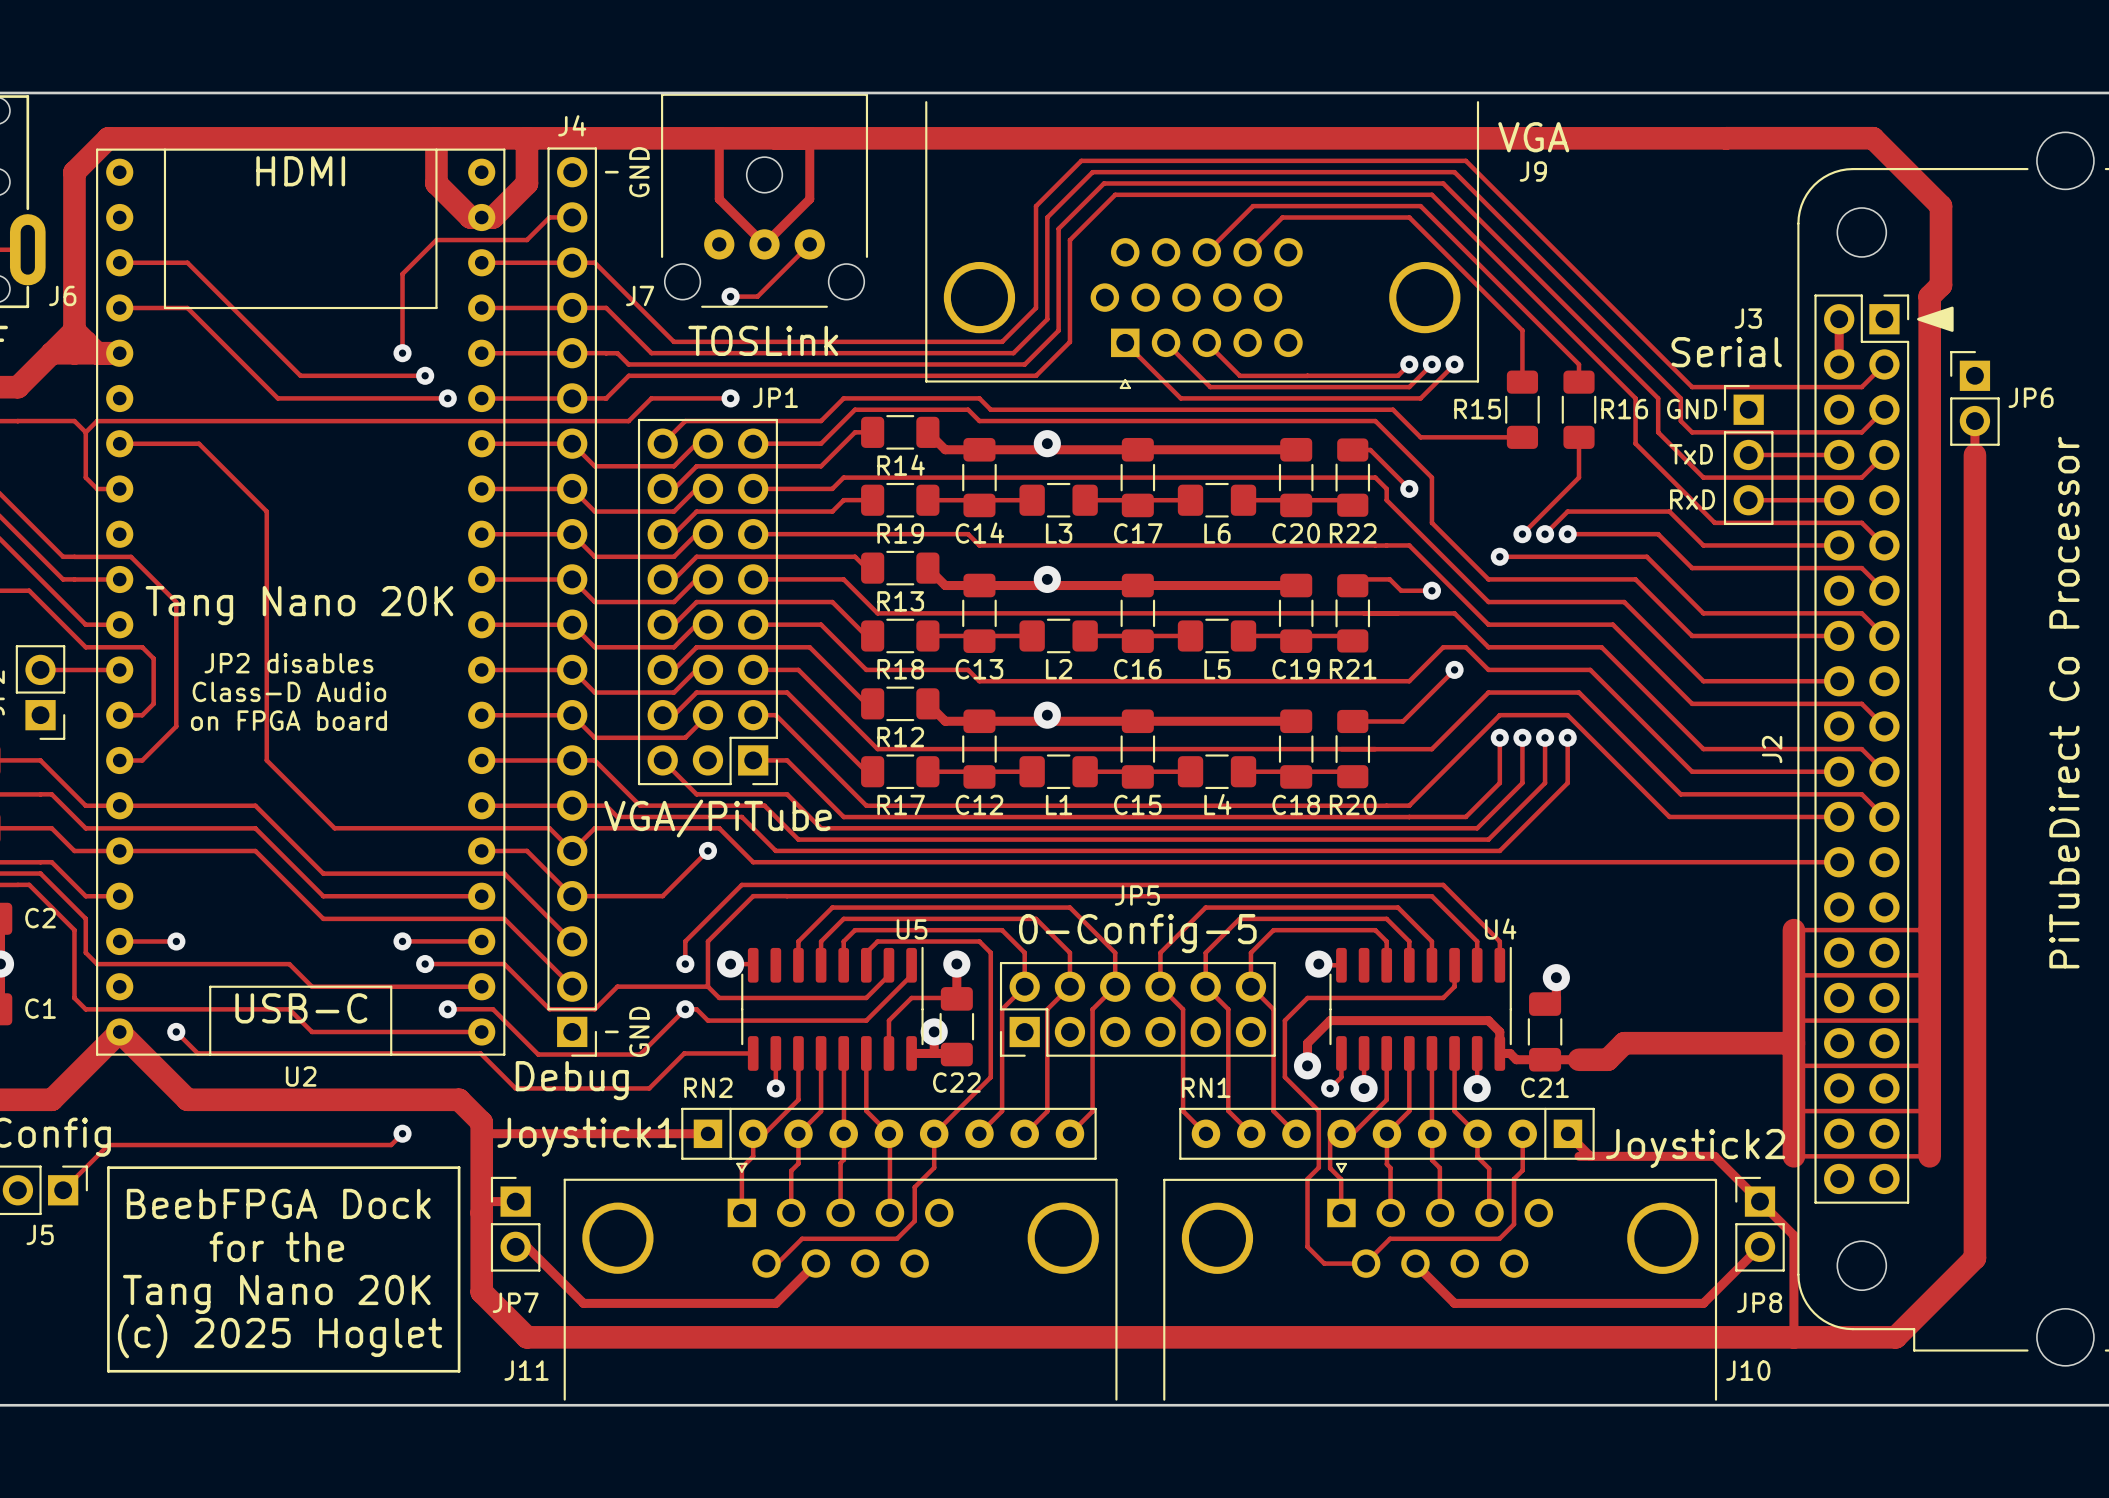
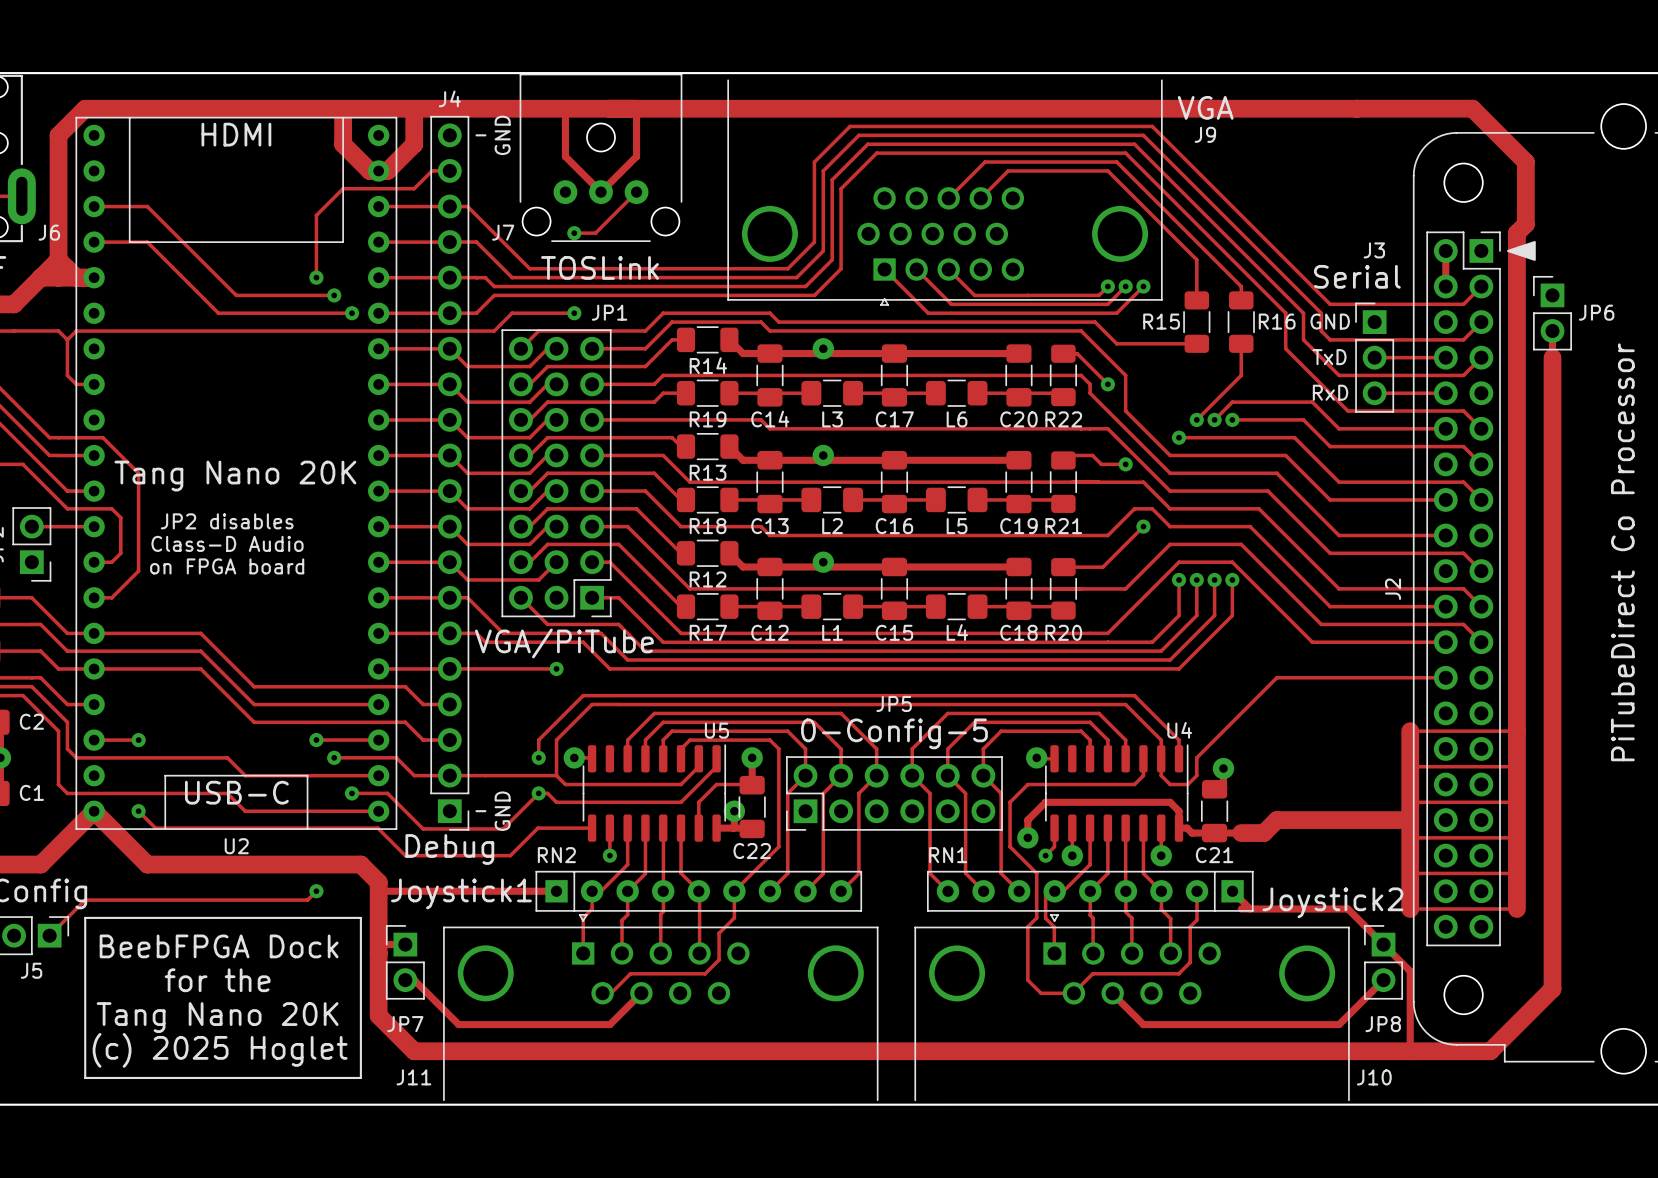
track: (119, 443) (198, 443) (266, 511) (266, 760) (334, 828) (549, 828) (572, 850) (594, 828) (719, 828) (753, 862) (1624, 862) -> (1161, 758) (1161, 775) (1170, 784) (1187, 784) (1196, 775) (1196, 757) (1276, 677)
track: (504, 850) (526, 850) (572, 896) (662, 896) (707, 850) -> (449, 668) (556, 668)
track: none -> (396, 668) (449, 668)
track: (504, 873) (572, 941) -> (396, 722) (405, 722) (423, 740) (449, 740)
track: none -> (396, 686) (405, 686) (423, 704) (449, 704)
track: (504, 918) (572, 986) -> none
track: (526, 986) (549, 1009) (594, 1009) (617, 986) -> (414, 775) (485, 775)

